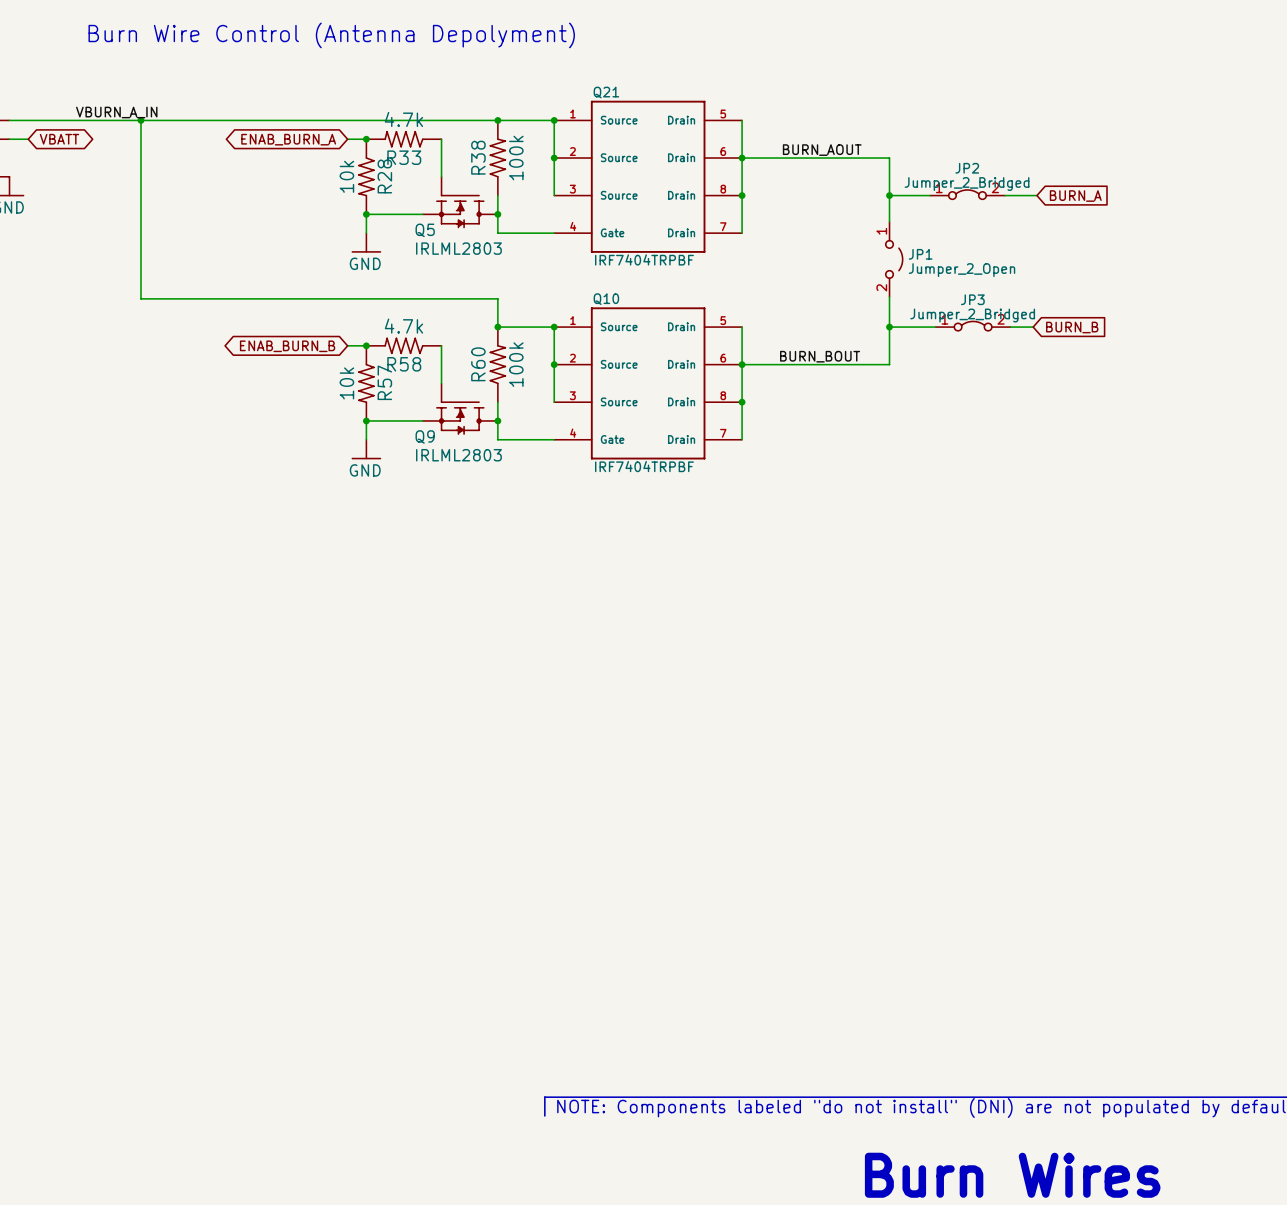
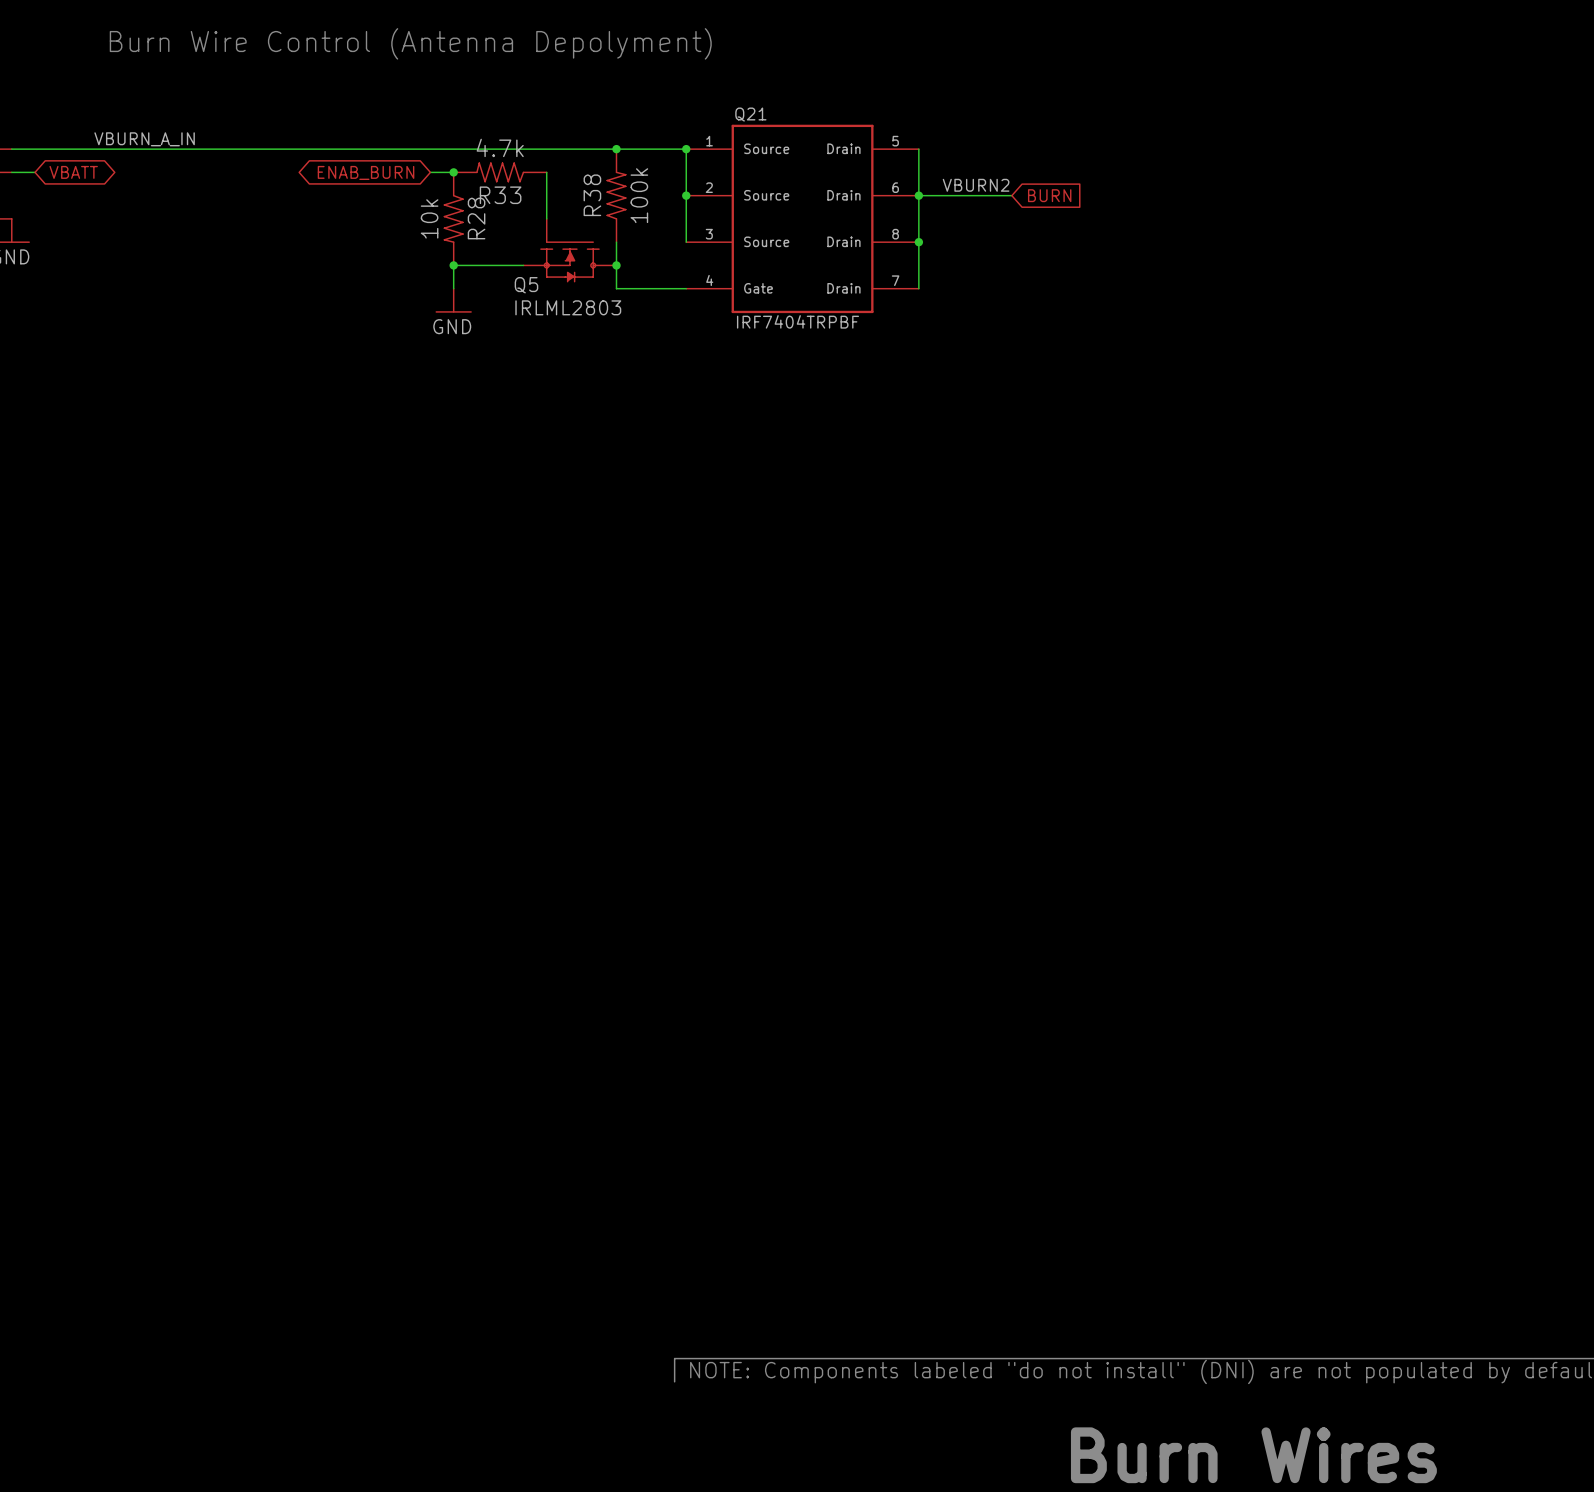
wire: (140, 120) (140, 298) (497, 298) (497, 327) (554, 327) (554, 402) -> none
junction: (140, 120) -> none
global label: ENAB_BURN_A (288, 139) -> ENAB_BURN (366, 172)
label: none -> VBURN2 (976, 185)
label: BURN_AOUT (822, 150) -> none
wire: (817, 158) (889, 158) (889, 221) -> none
global label: none -> BURN (1049, 195)
JP2: Jumper_2_Bridged (967, 194) -> none
wire: (889, 195) (929, 195) -> none
junction: (889, 195) -> none
wire: (1005, 195) (1036, 195) -> none
global label: BURN_A (1075, 196) -> none
JP1: Jumper_2_Open (894, 259) -> none
wire: (889, 297) (889, 364) (742, 364) -> none
JP3: Jumper_2_Bridged (973, 326) -> none
junction: (497, 327) -> none
junction: (554, 327) -> none
wire: (742, 327) (742, 439) -> none
wire: (889, 327) (935, 327) -> none
junction: (889, 327) -> none
wire: (1010, 327) (1033, 327) -> none
global label: BURN_B (1072, 327) -> none
wire: (347, 345) (366, 345) -> none
junction: (366, 345) -> none
R58: 4.7k (403, 345) -> none
wire: (441, 345) (441, 383) -> none
global label: ENAB_BURN_B (287, 346) -> none
label: BURN_BOUT (820, 356) -> none
R60: 100k (497, 364) -> none
junction: (554, 364) -> none
junction: (742, 364) -> none
R57: 10k (366, 383) -> none
Q10: IRF7404TRPBF (648, 383) -> none
wire: (497, 402) (497, 439) (554, 439) -> none
junction: (742, 402) -> none
Q9: IRLML2803 (460, 408) -> none
junction: (366, 420) -> none
wire: (422, 420) (366, 420) (366, 439) -> none
junction: (497, 420) -> none
power symbol: GND (366, 449) -> none

